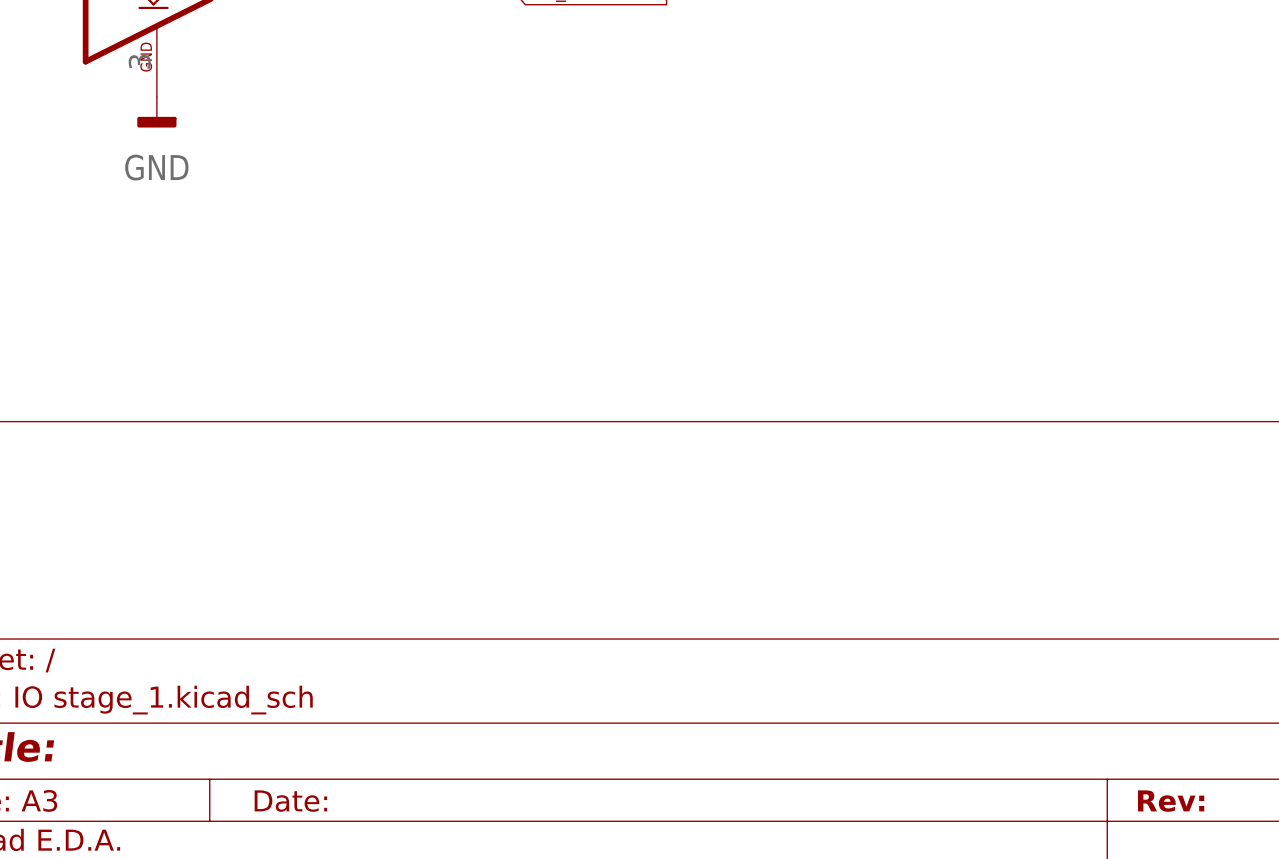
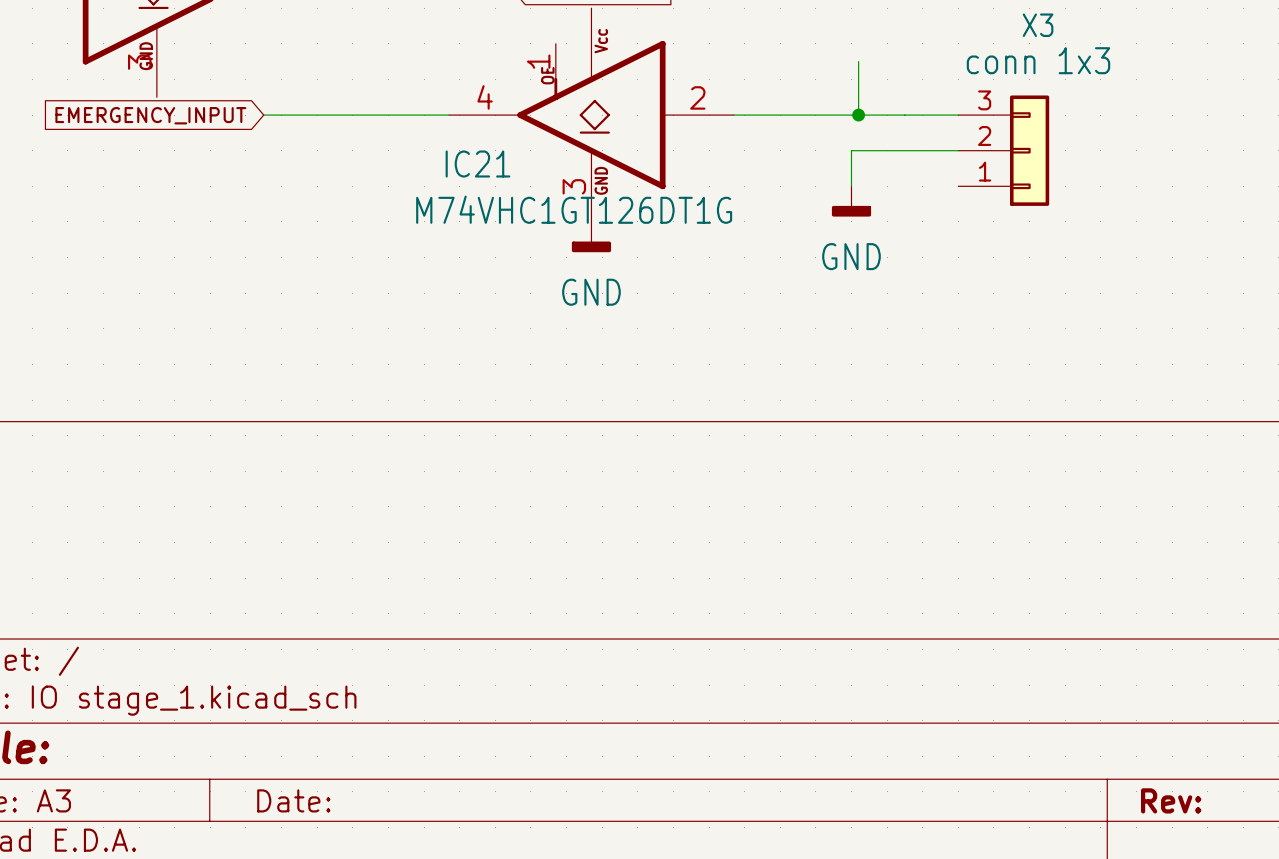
wire: none -> (858, 61) (858, 115)
power symbol: GND (156, 112) -> none
wire: none -> (263, 115) (448, 115)
IC21: none -> M74VHC1GT126DT1G (591, 115)
wire: none -> (733, 115) (958, 115)
junction: none -> (858, 115)
global label: none -> EMERGENCY_INPUT (150, 115)
wire: none -> (958, 150) (851, 150) (851, 186)
X3: none -> conn 1x3 (1003, 150)
power symbol: none -> GND (851, 201)
power symbol: none -> GND (591, 237)

